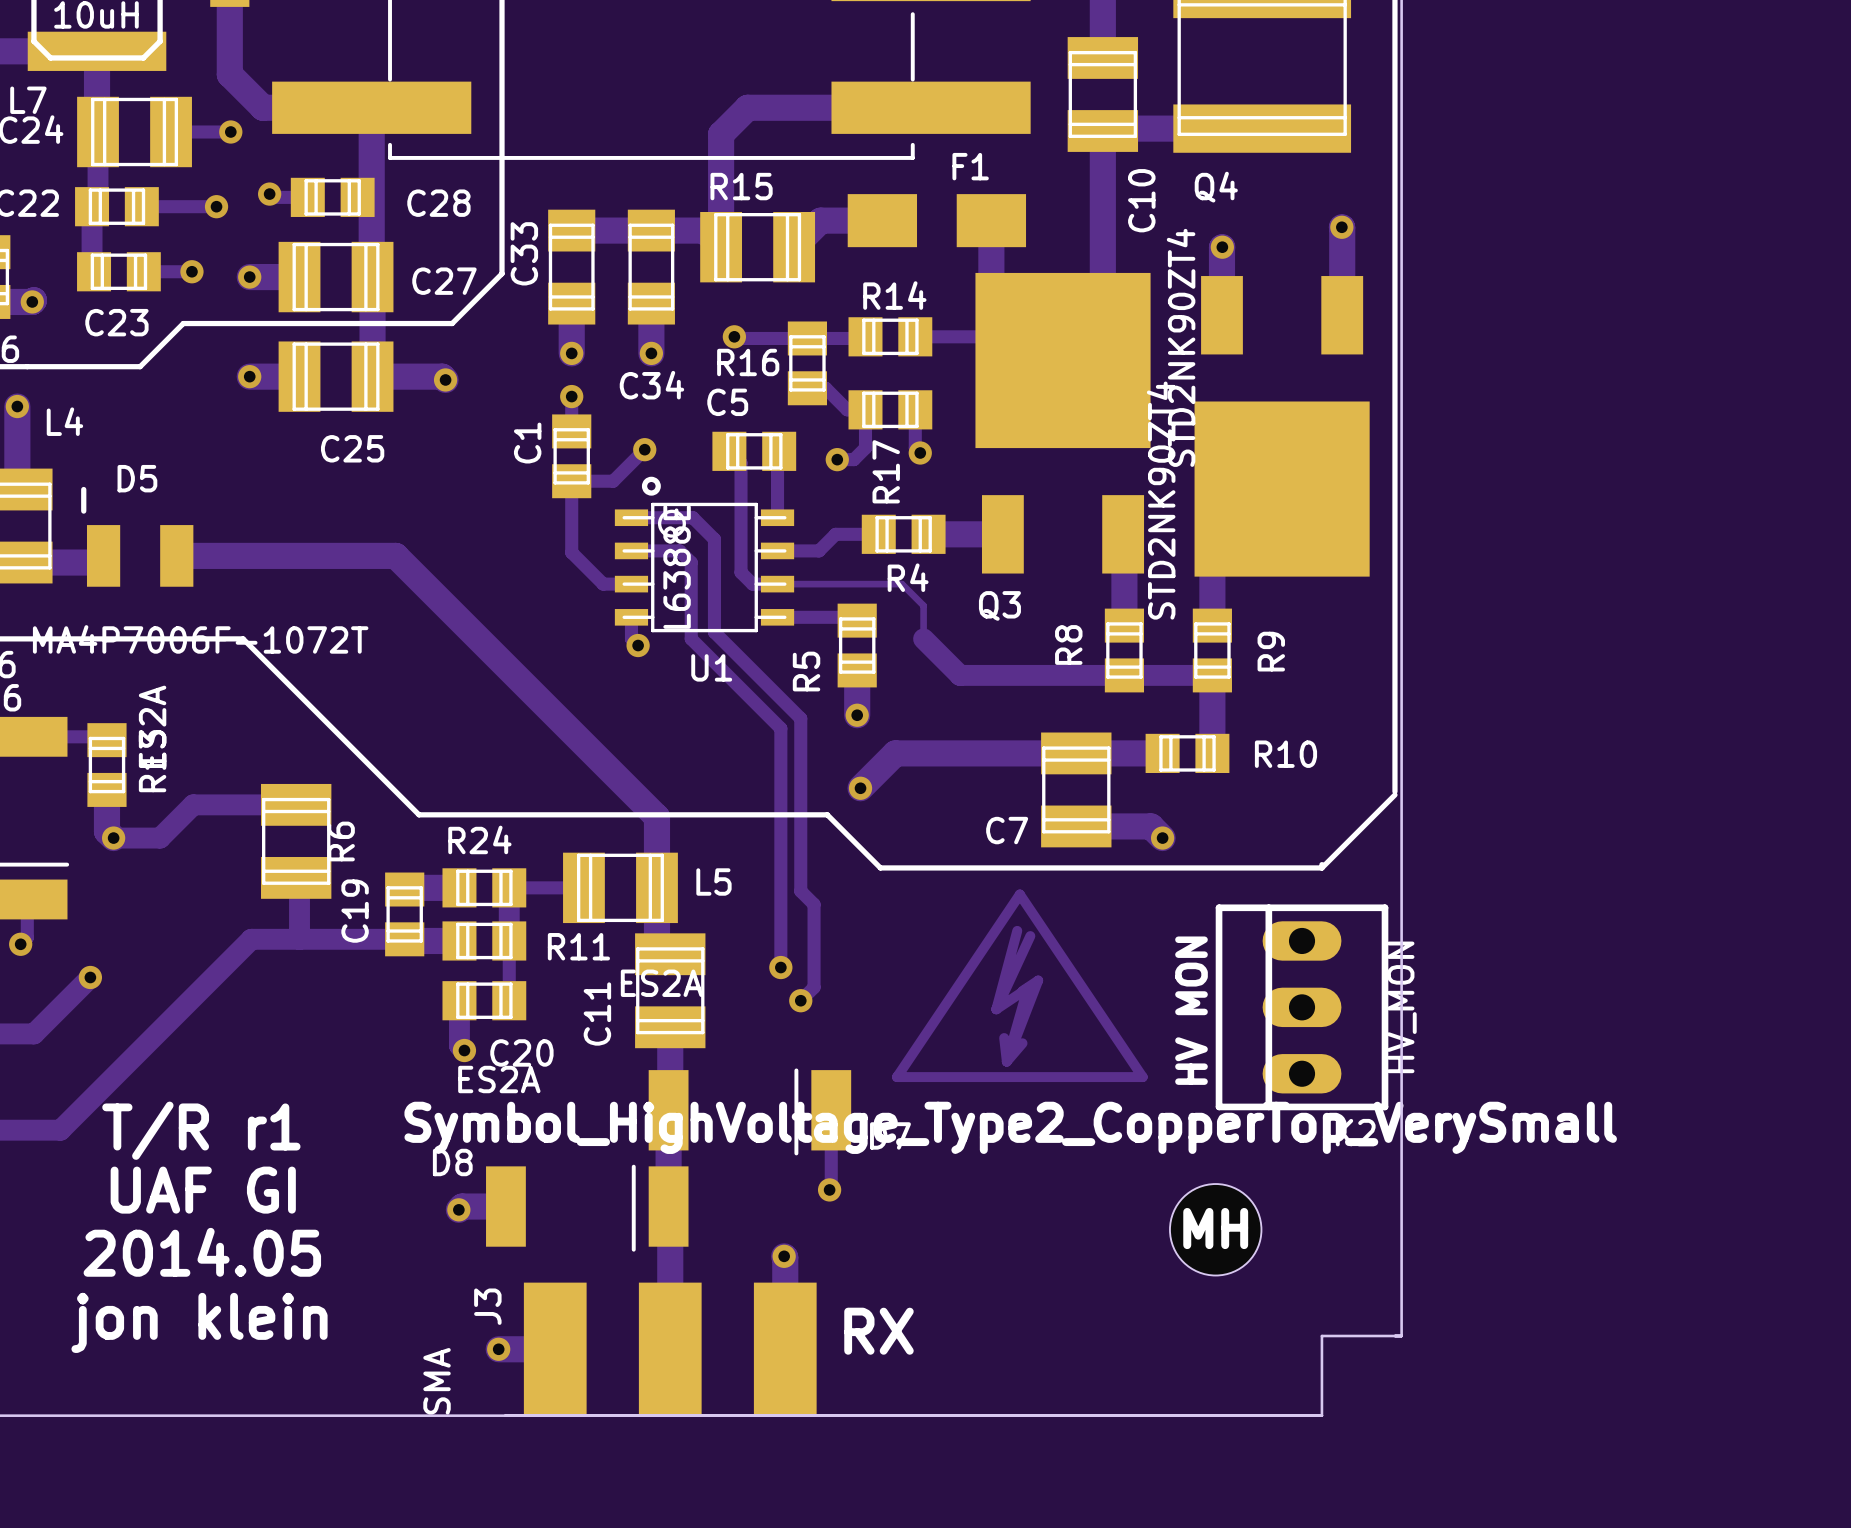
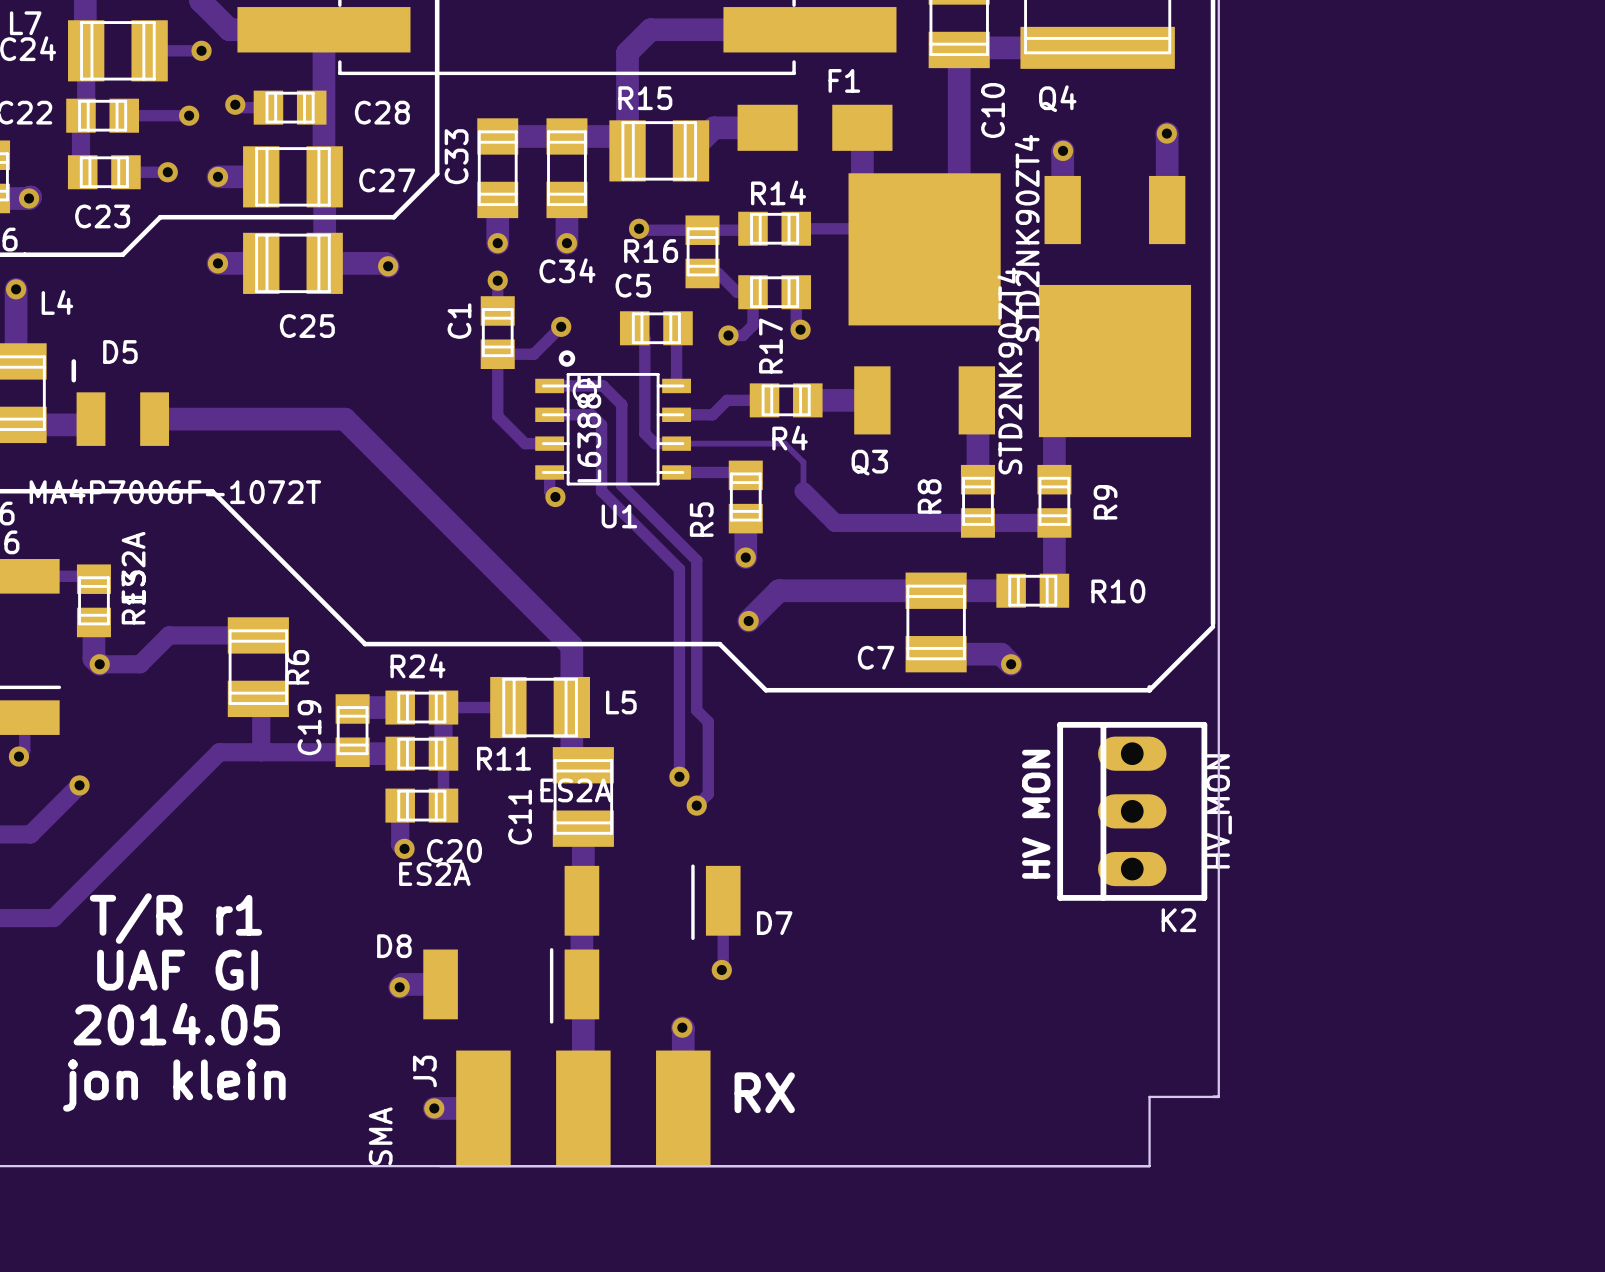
drawing: [892, 889, 1148, 1083] -> none
MH: (1215, 1229) -> none

